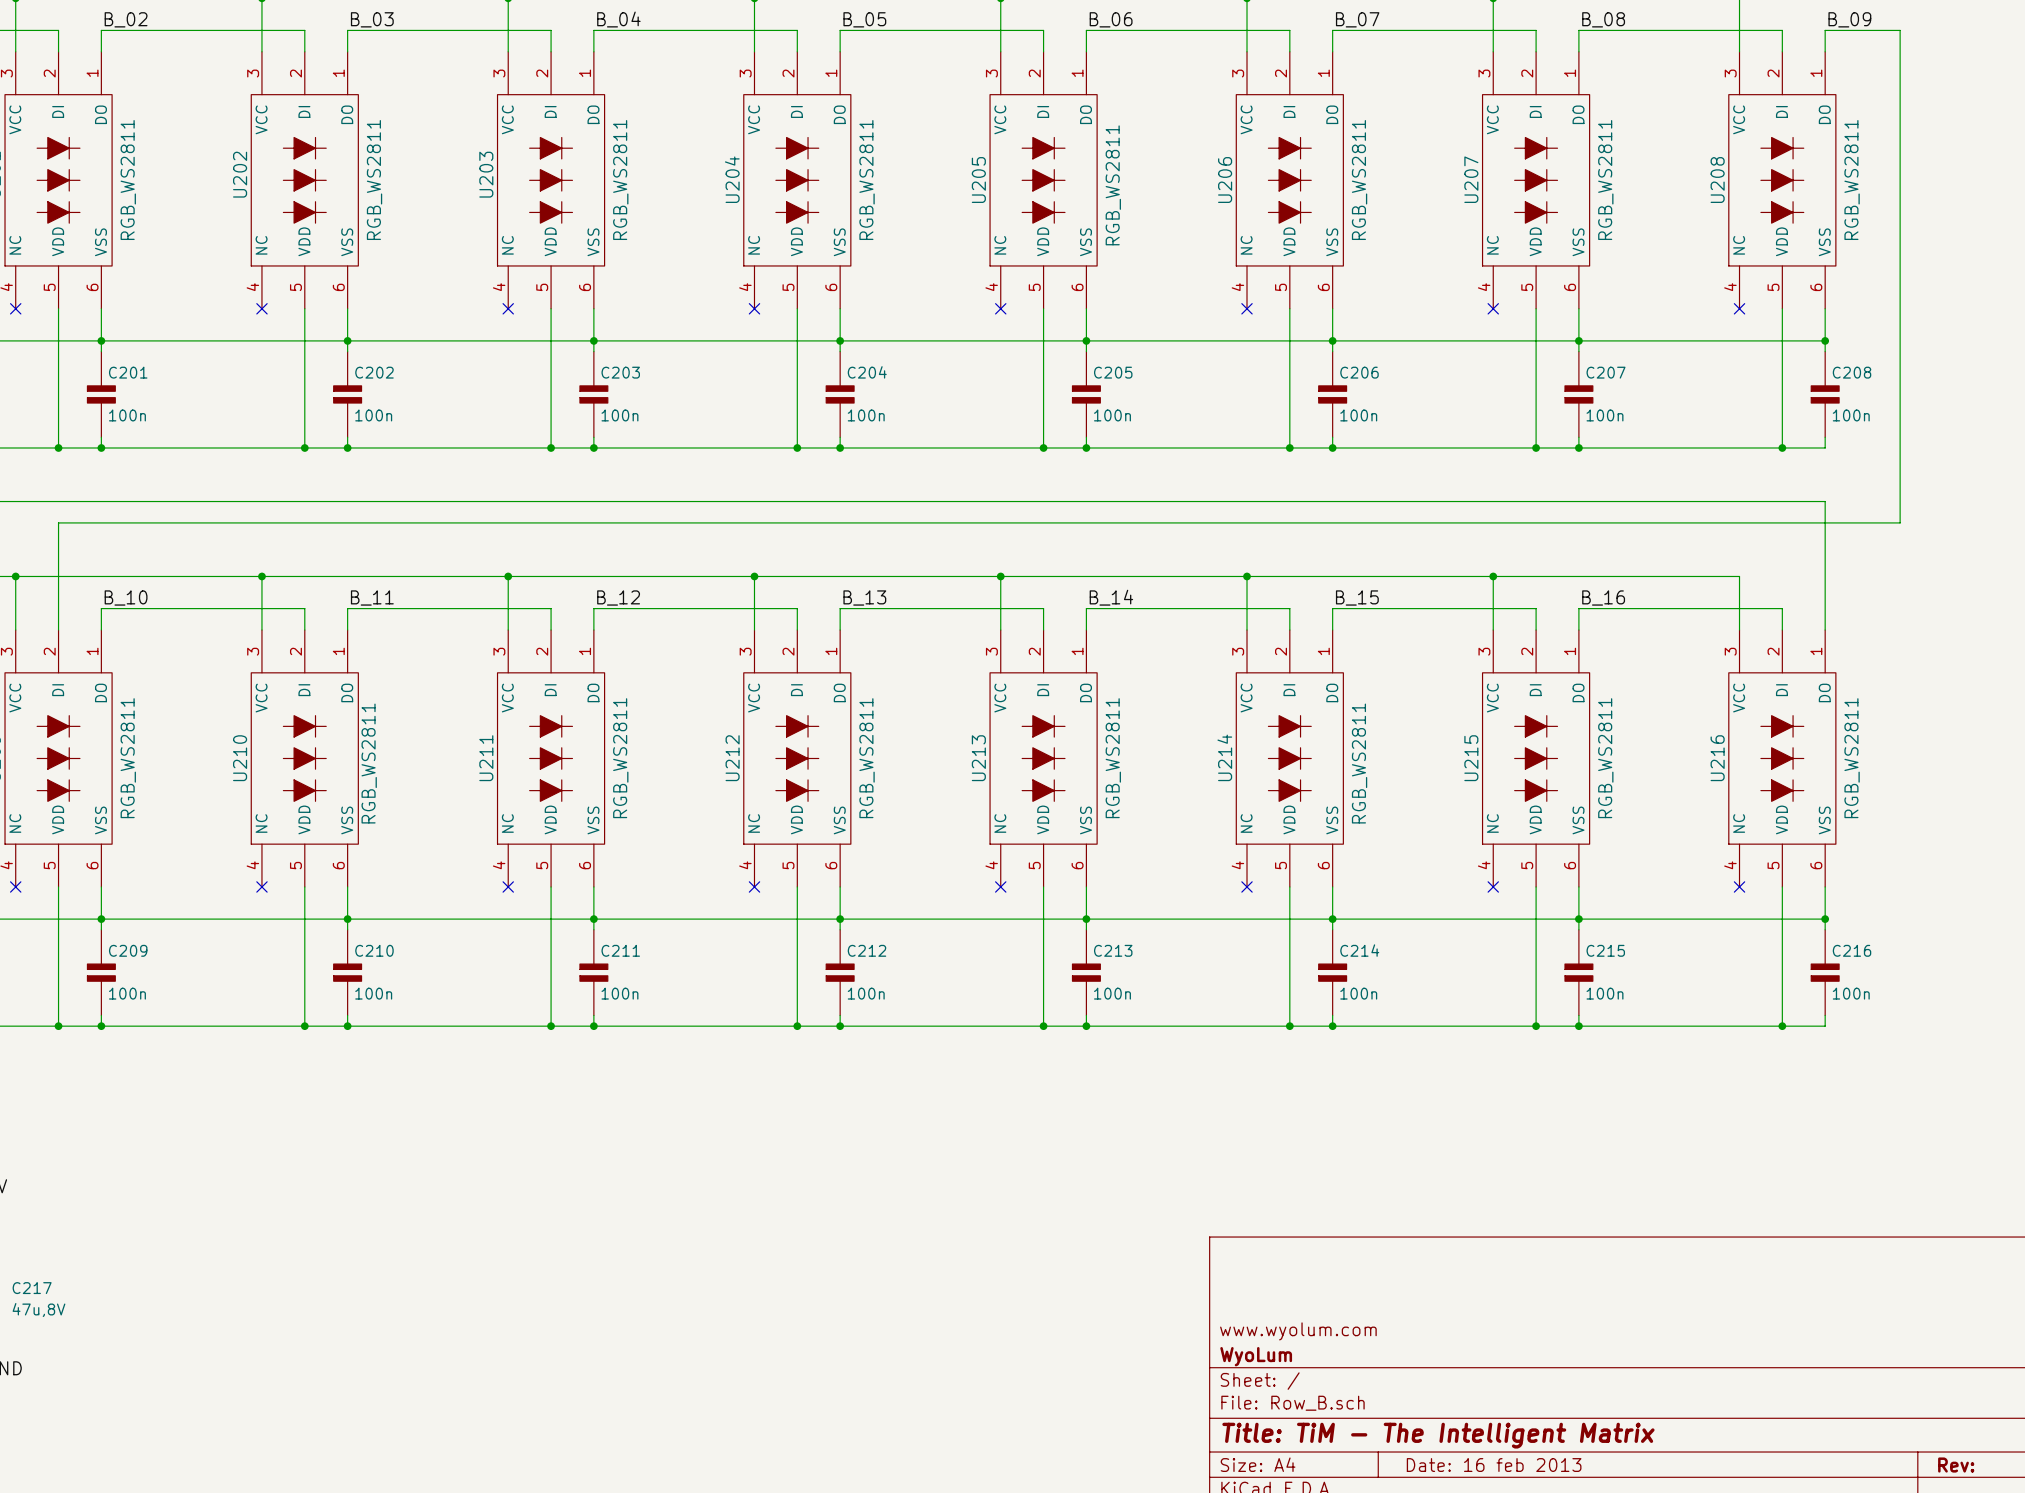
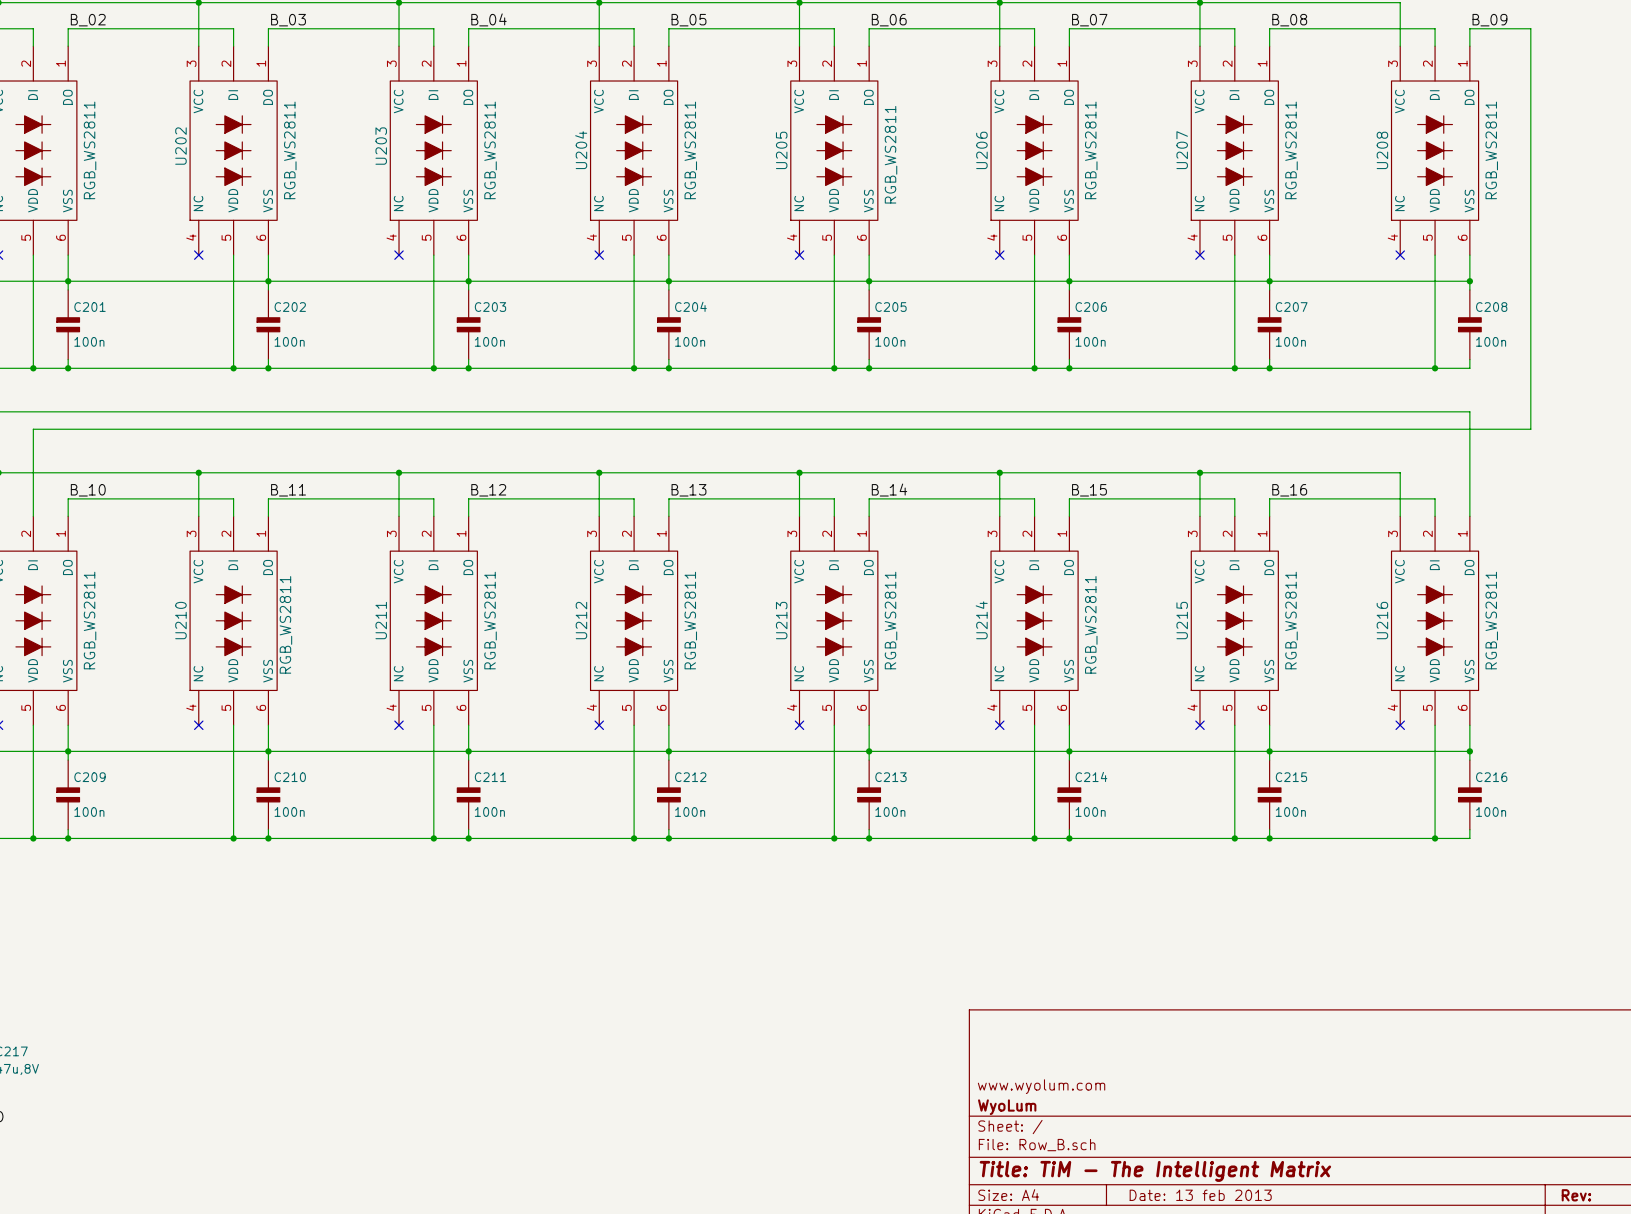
title block: Date: 16 feb 2013 (1494, 1465) -> Date: 13 feb 2013 (1200, 1195)

